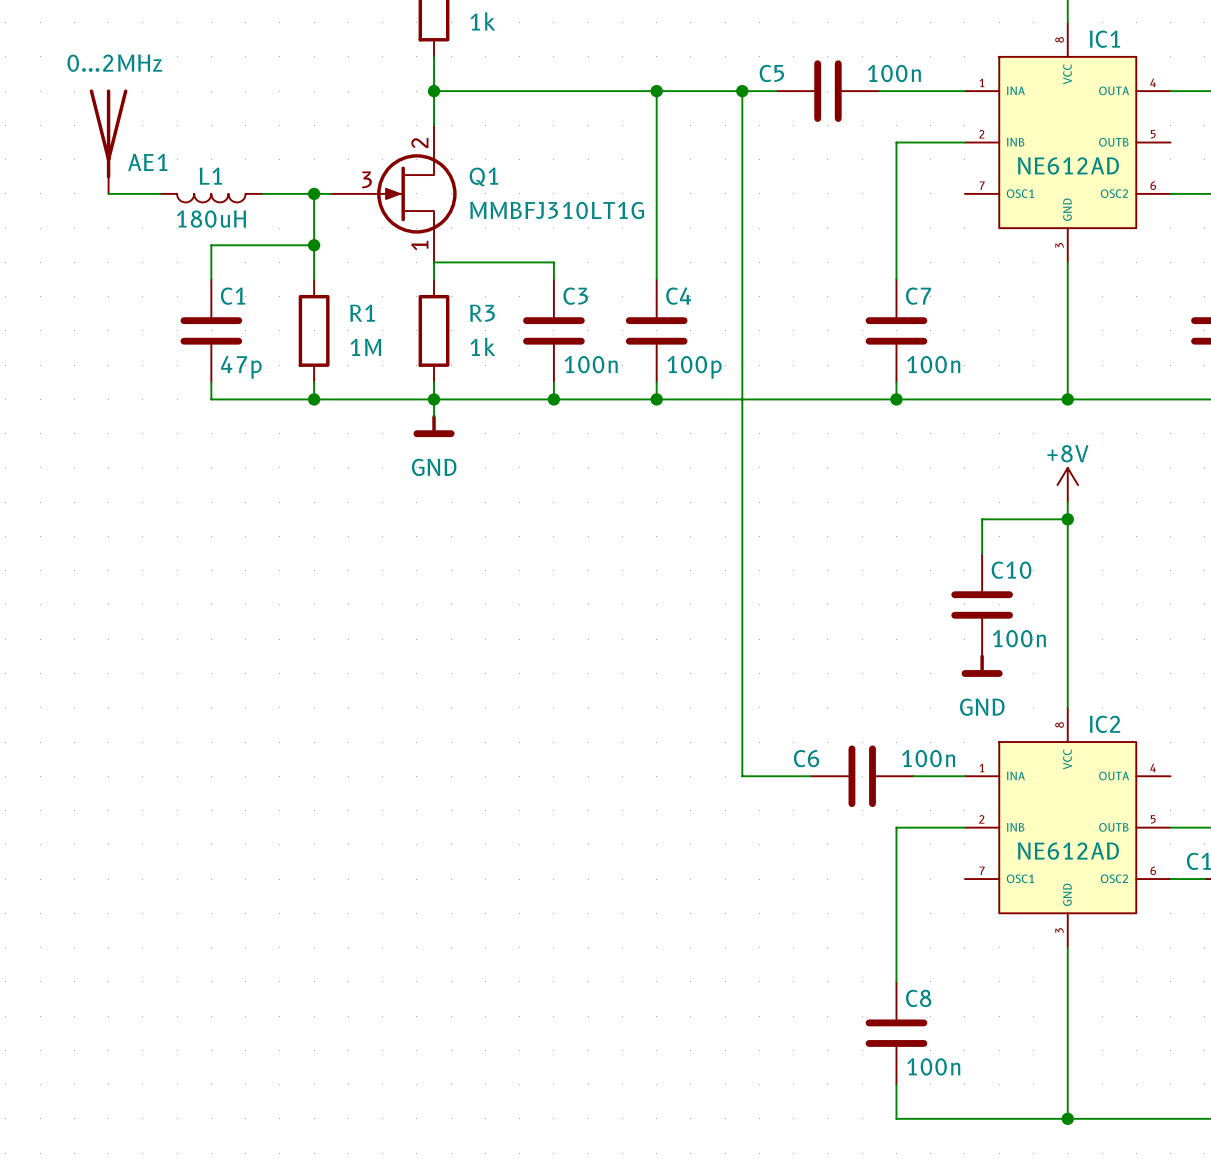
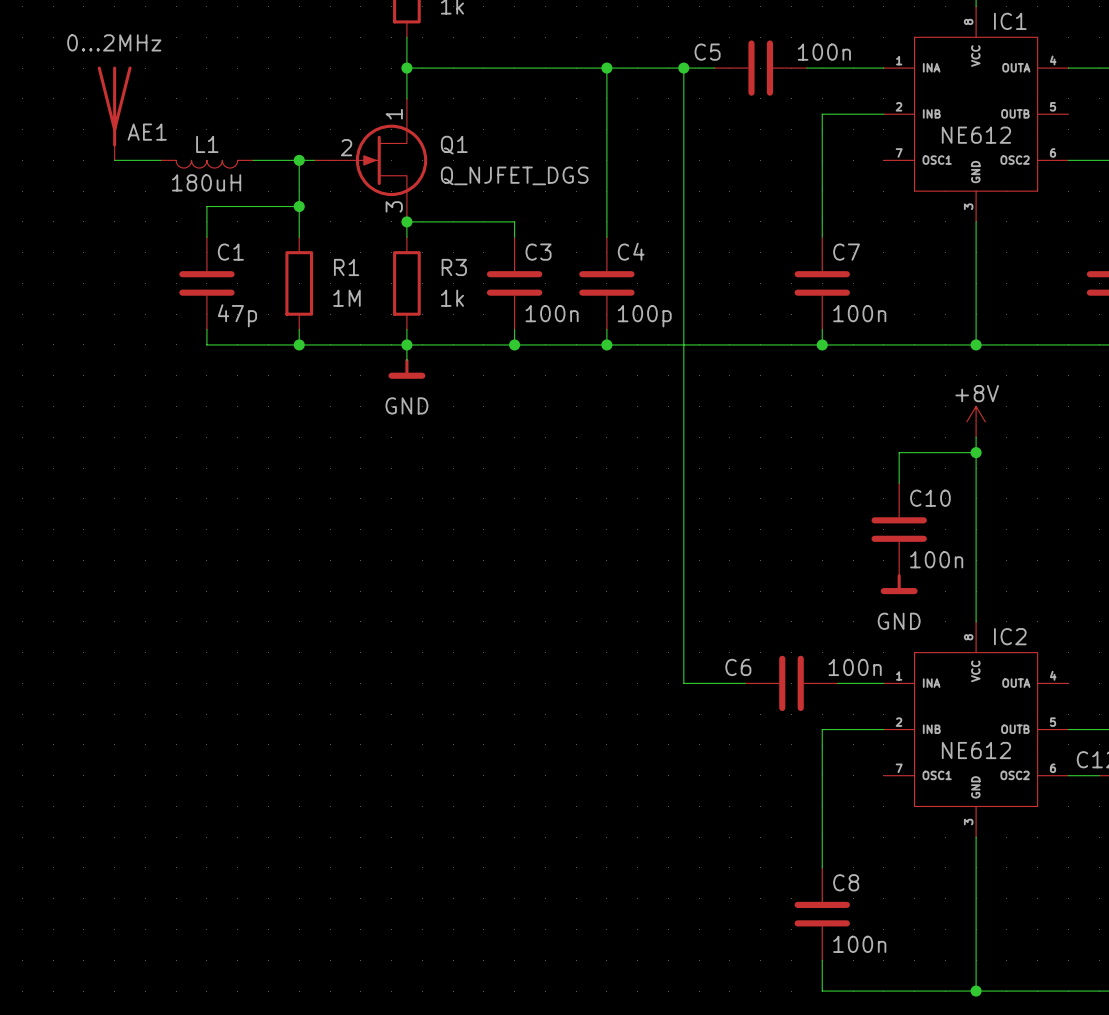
Q1 pin number: 2 (419, 143) -> 1 (394, 114)
IC1 value: NE612AD (1068, 165) -> NE612 (976, 135)
Q1 pin number: 3 (366, 179) -> 2 (346, 147)
Q1 value: MMBFJ310LT1G (557, 210) -> Q_NJFET_DGS (514, 175)
Q1 pin number: 1 (419, 245) -> 3 (394, 206)
junction: none -> (406, 221)
IC2 value: NE612AD (1068, 851) -> NE612 (976, 750)

